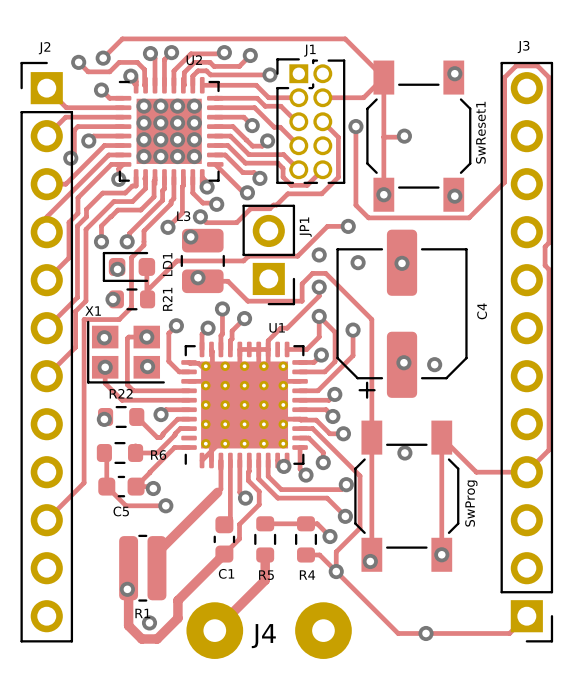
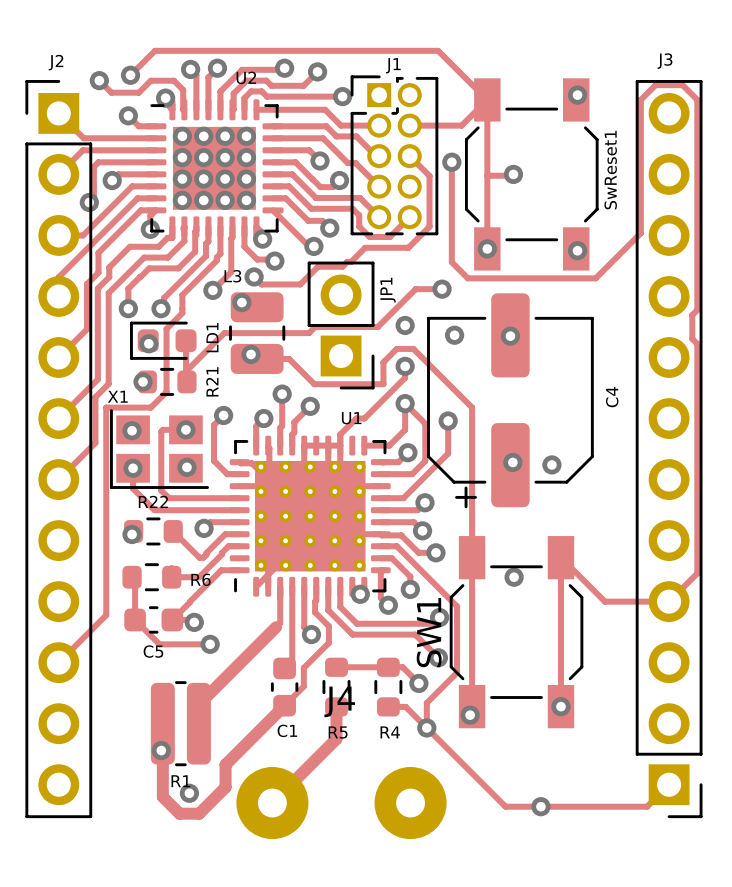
SwProg name: SwProg (471, 503) -> SW1 (429, 632)
J4 name position: J4 (263, 636) -> J4 (339, 701)

